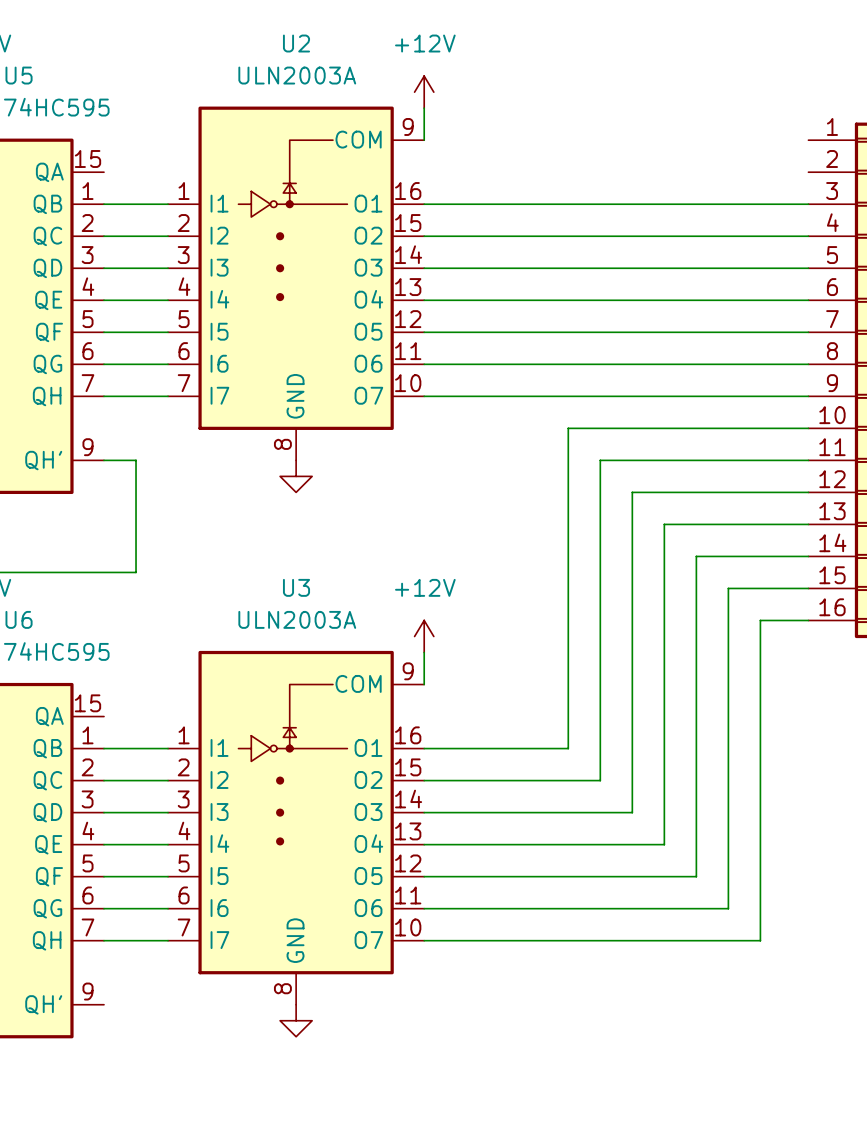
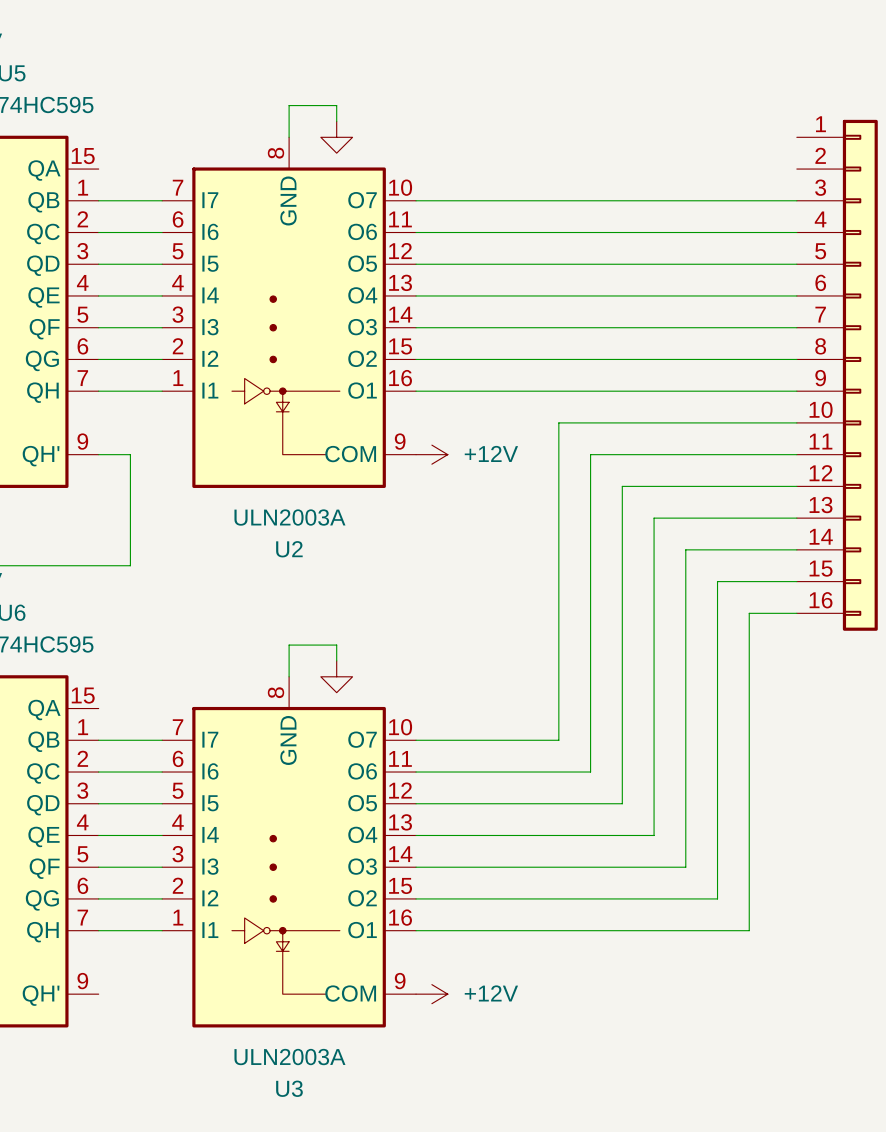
power symbol: +12V (424, 92) -> none
wire: (424, 108) (424, 140) -> none
power symbol: none -> (336, 137)
U2 flip: as is (296, 268) -> up-down (289, 327)
power symbol: (296, 476) -> none
power symbol rotation: 0° (424, 636) -> 90° clockwise (431, 454)
power symbol position: +12V (424, 636) -> +12V (431, 454)
wire: (424, 652) (424, 684) -> none
power symbol: none -> (336, 676)
U3 flip: as is (296, 812) -> up-down (289, 867)
power symbol: none -> +12V (431, 994)
power symbol: (296, 1020) -> none

